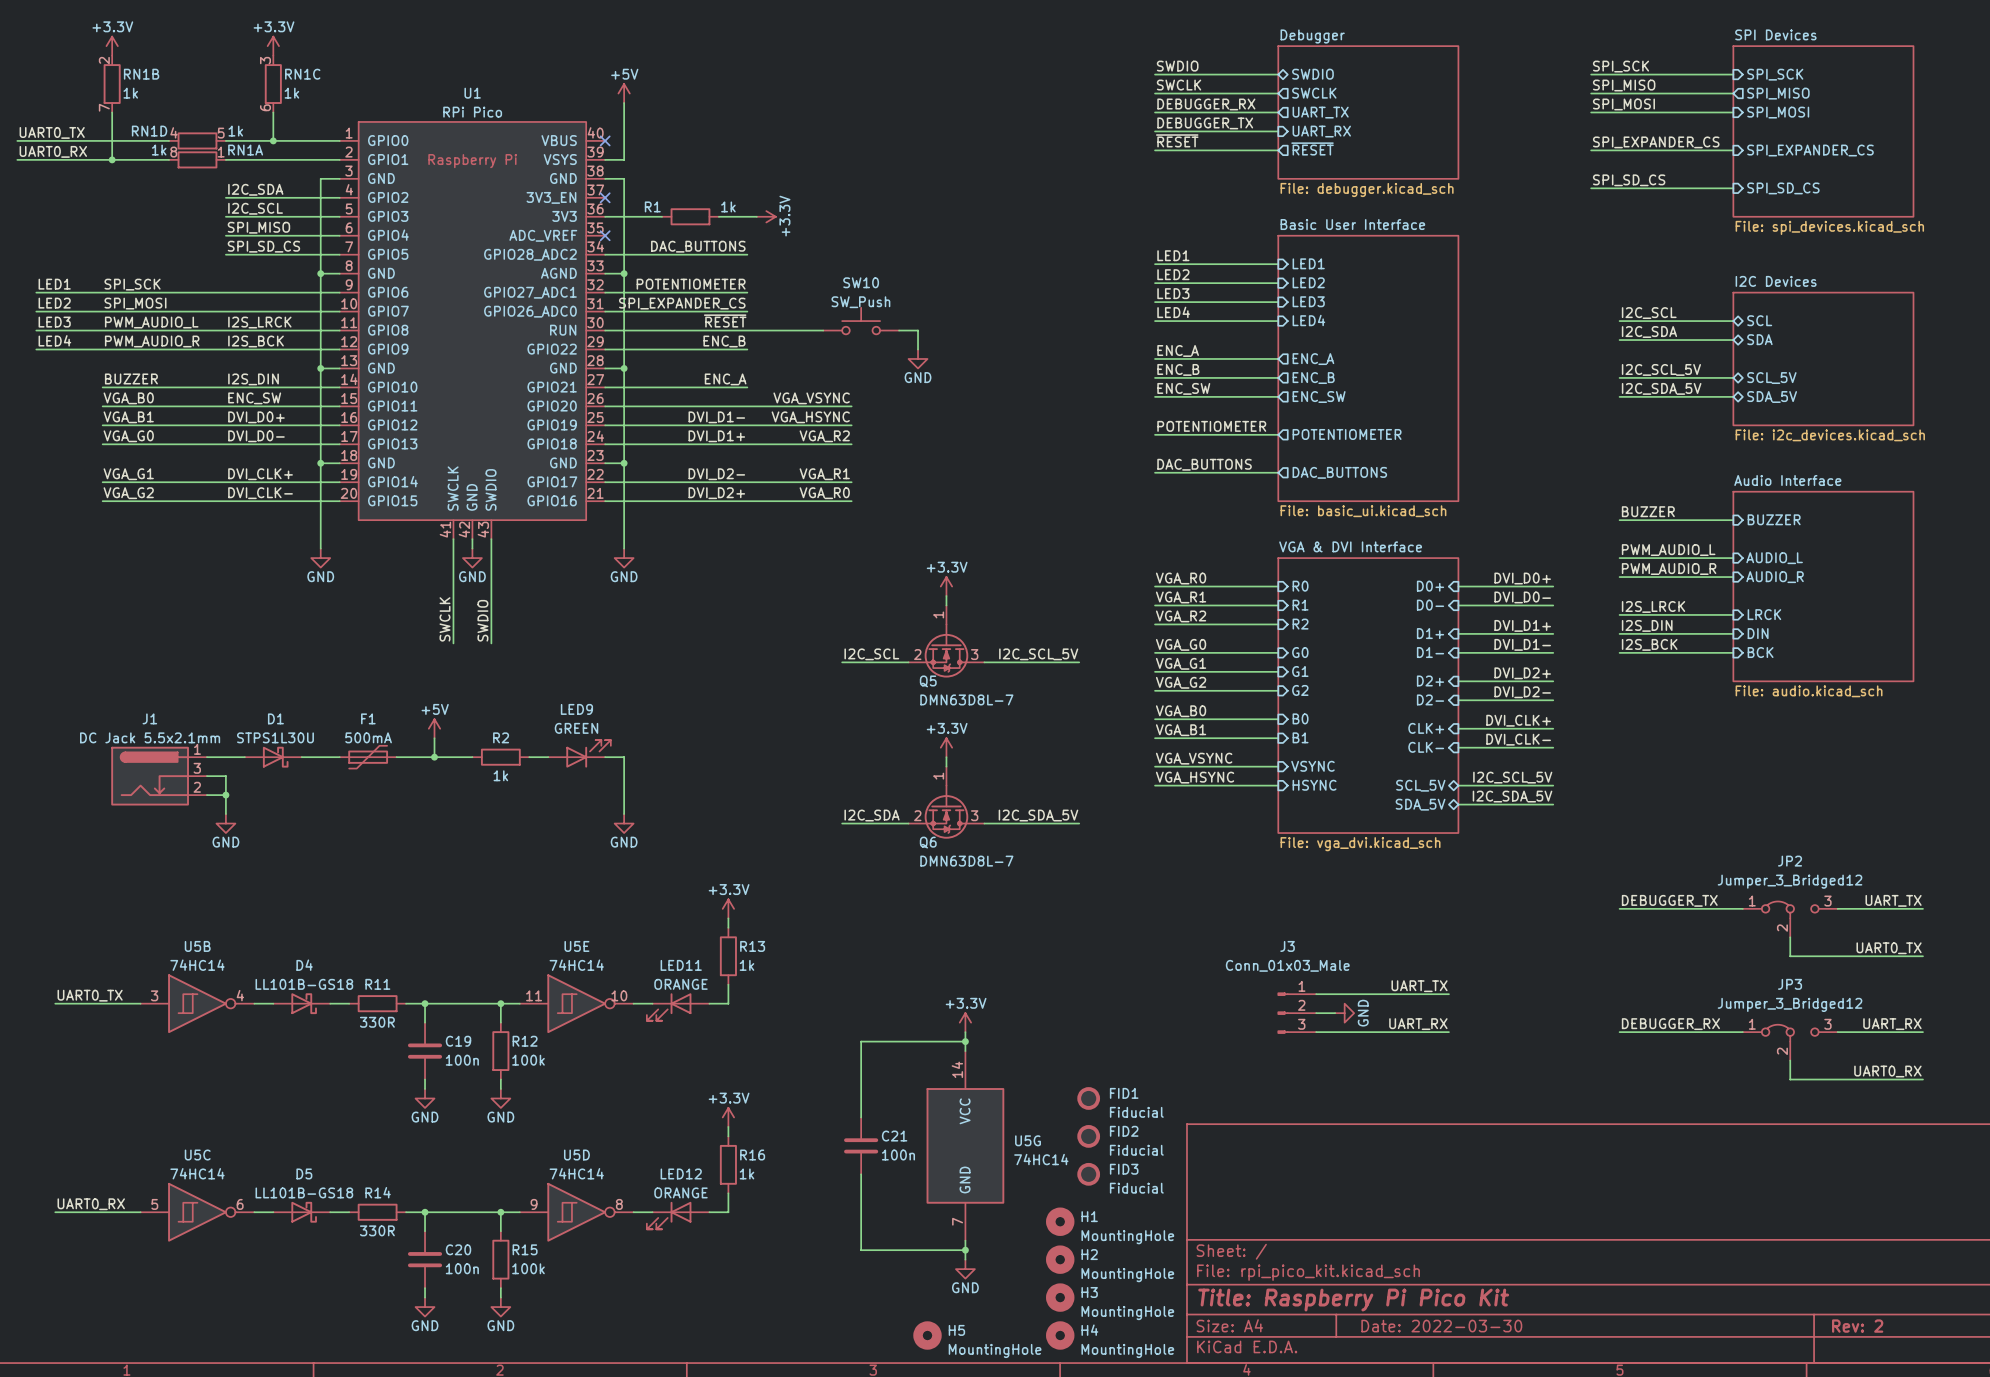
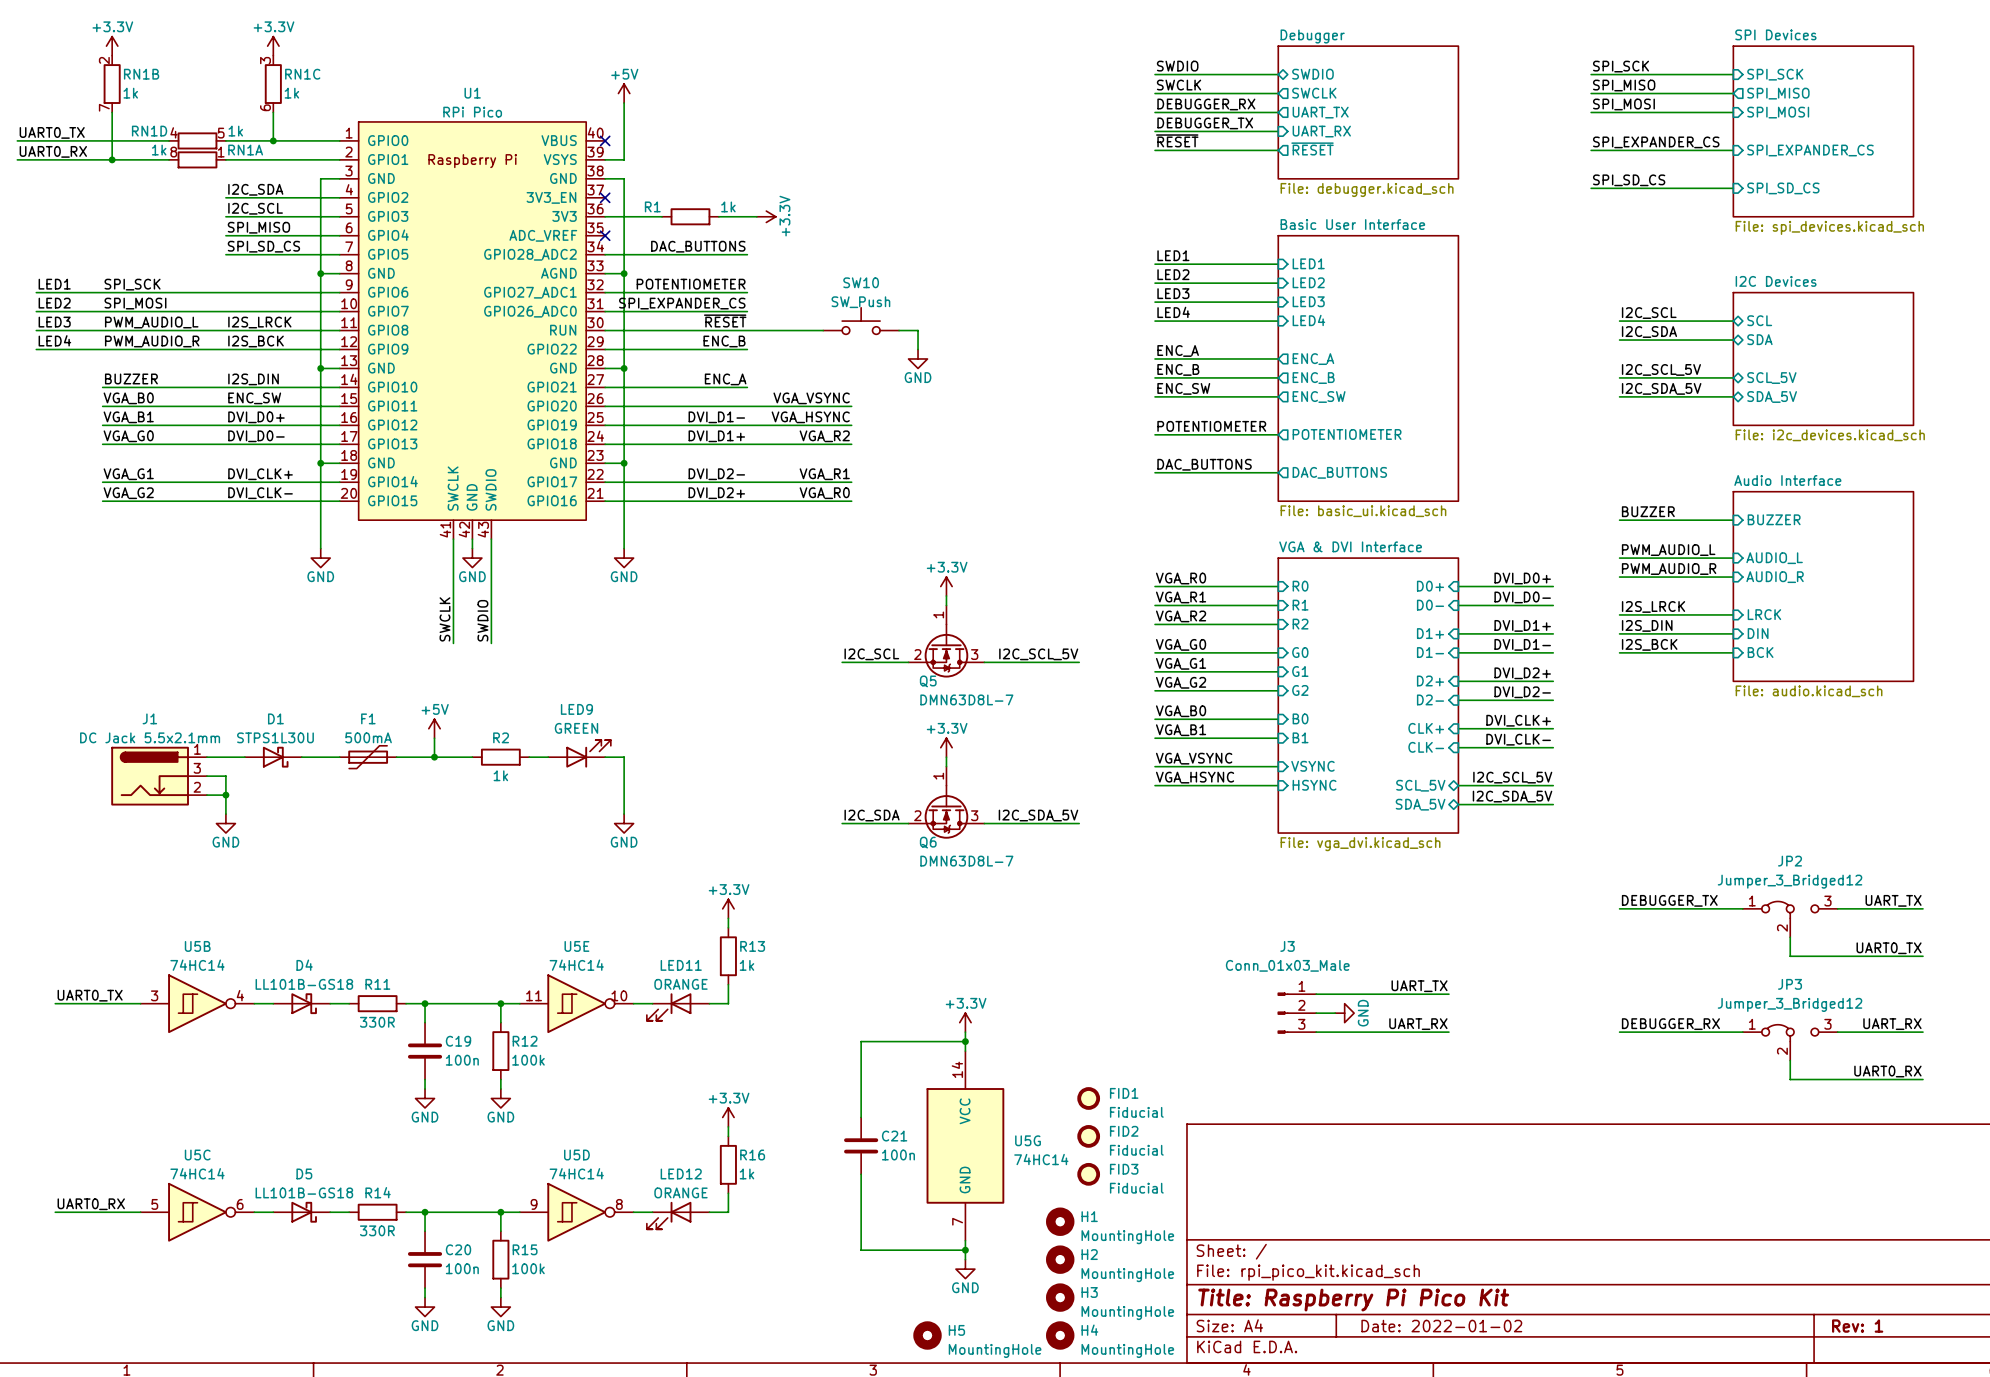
title block: Date: 2022-03-30 (1441, 1326) -> Date: 2022-01-02 (1441, 1326)
title block: Rev: 2 (1857, 1326) -> Rev: 1 (1857, 1326)

